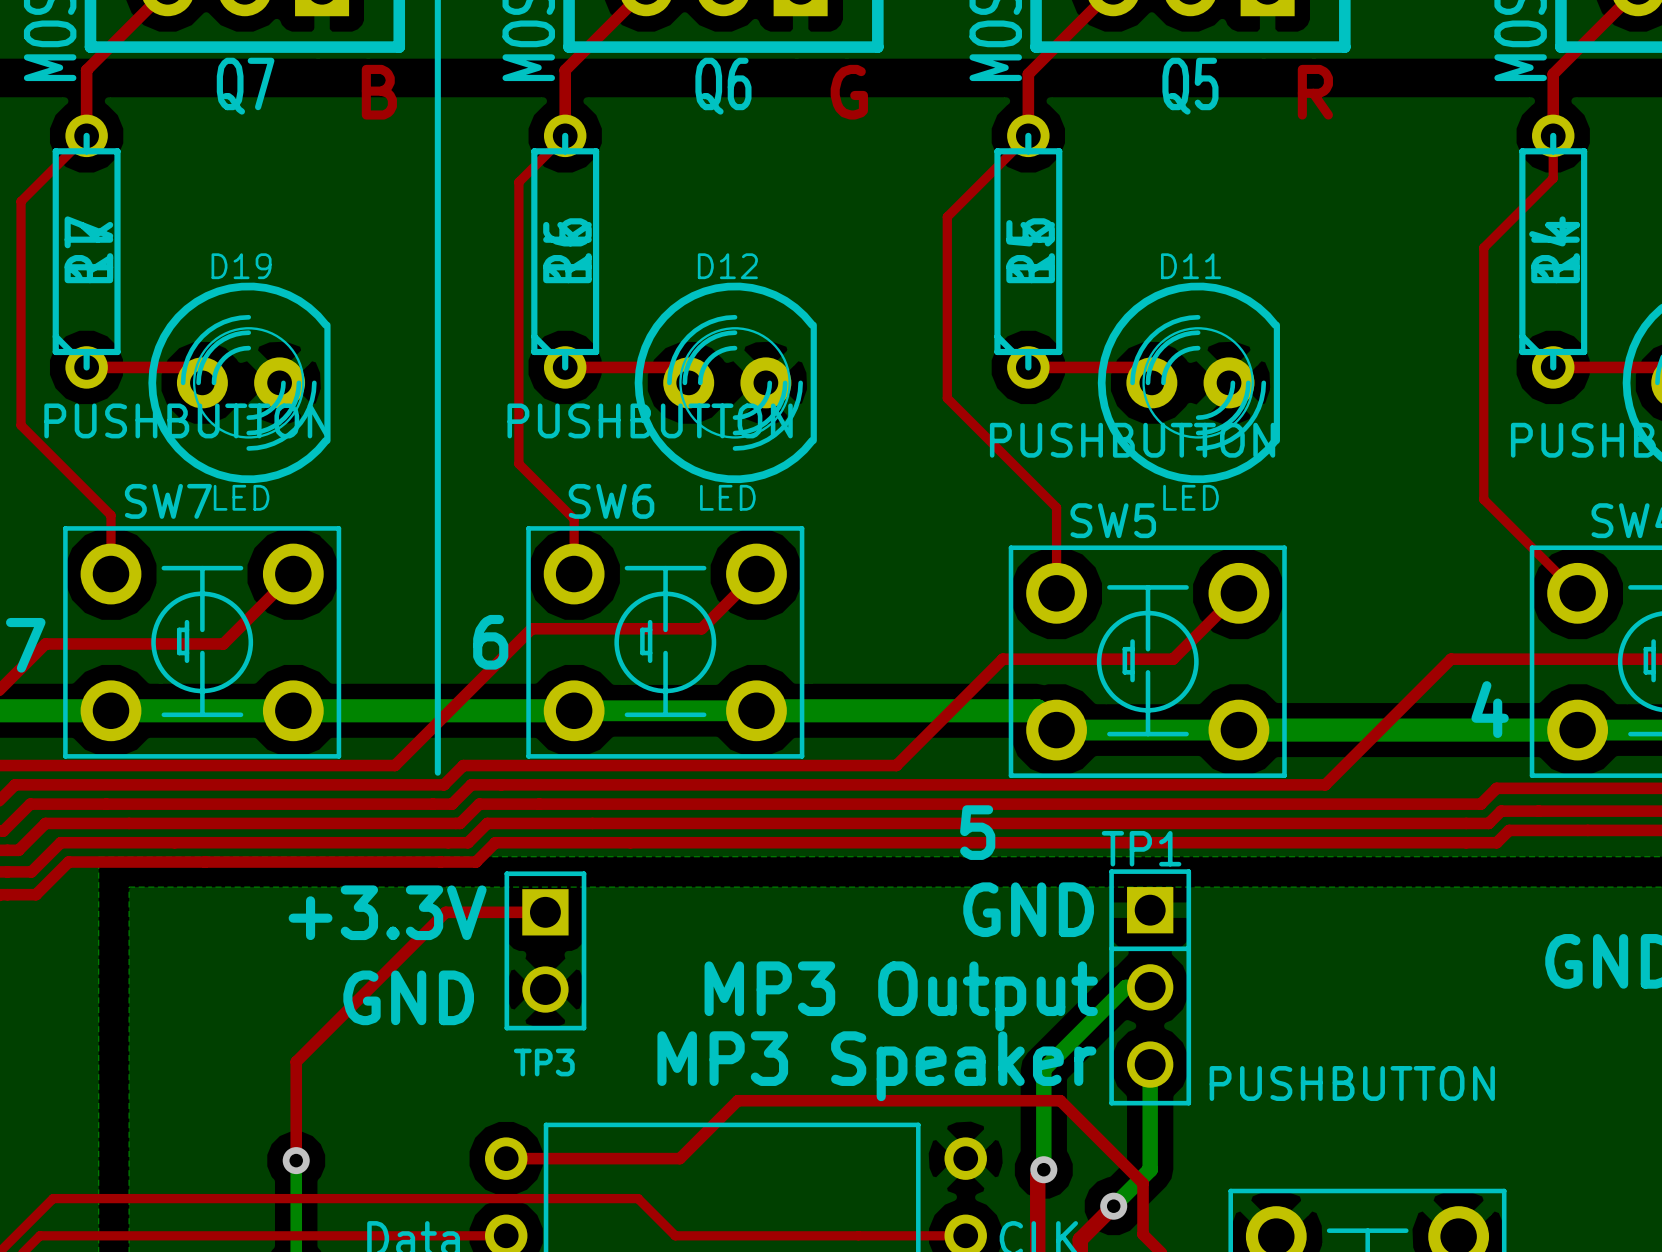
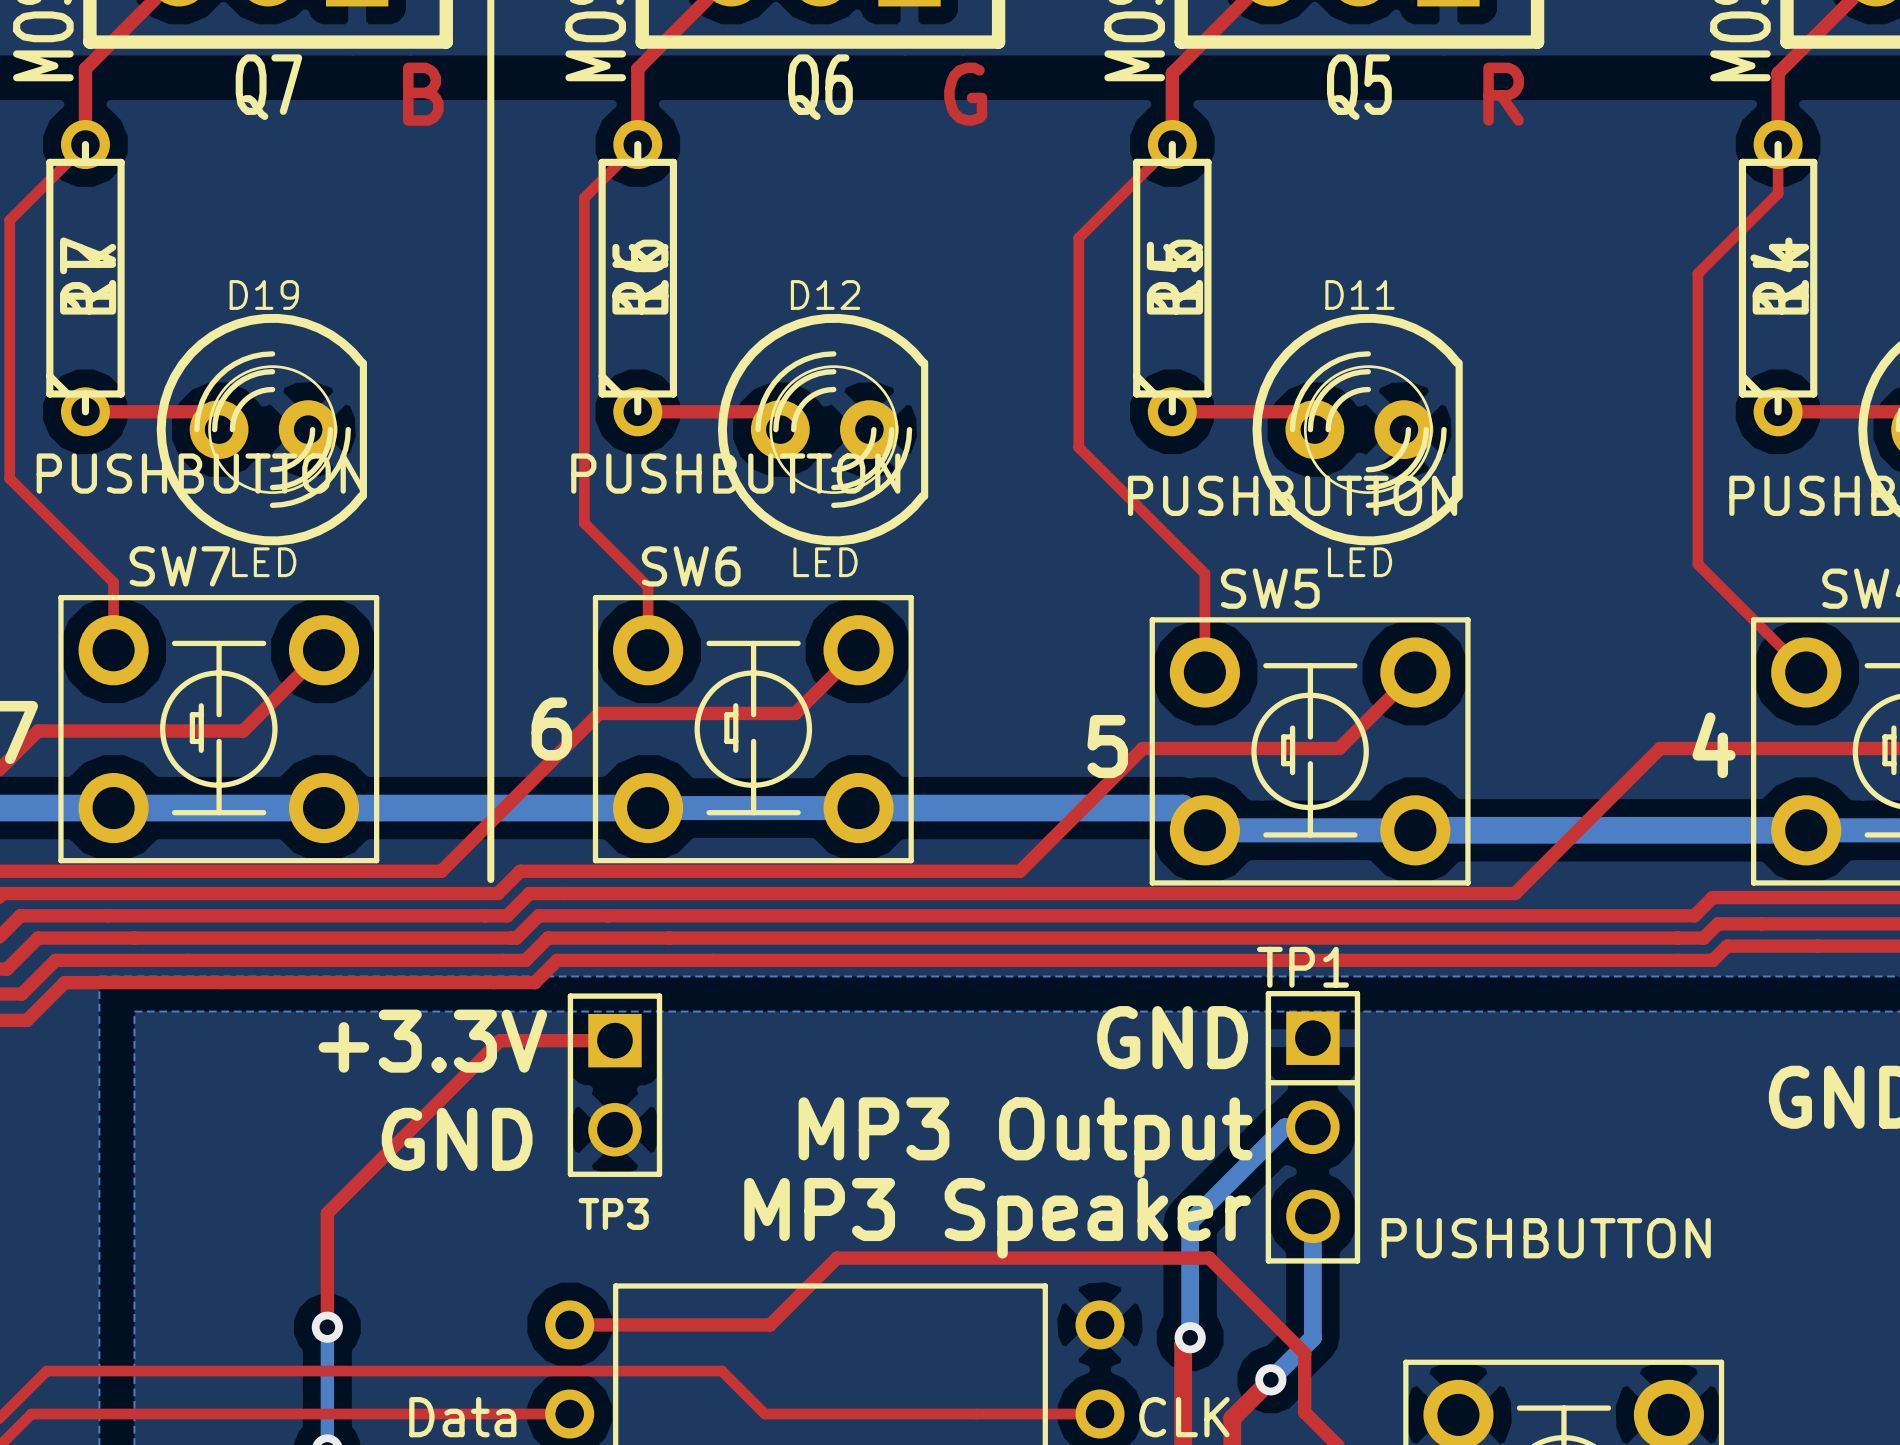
text position: 4 (1490, 709) -> 4 (1714, 745)
text position: 5 (977, 832) -> 5 (1107, 746)

